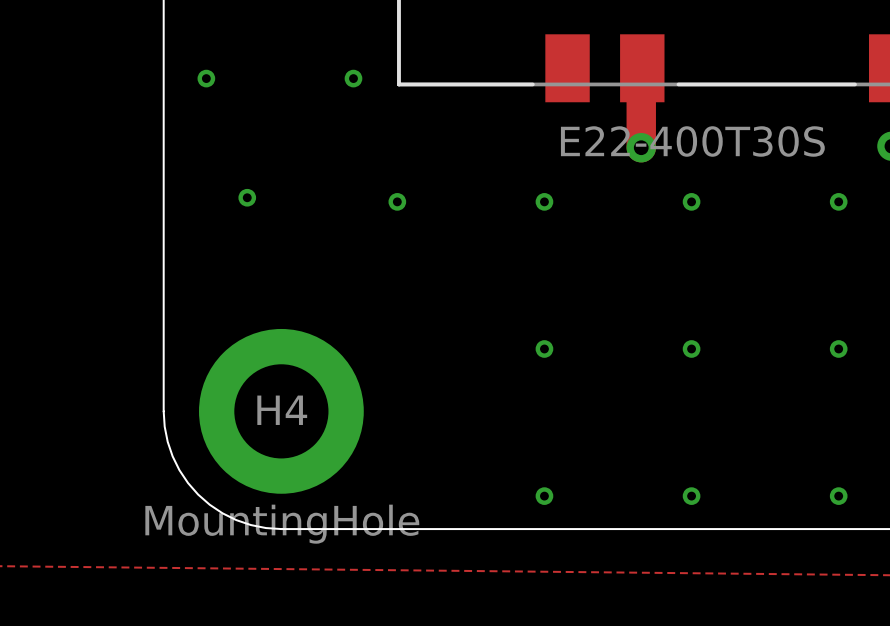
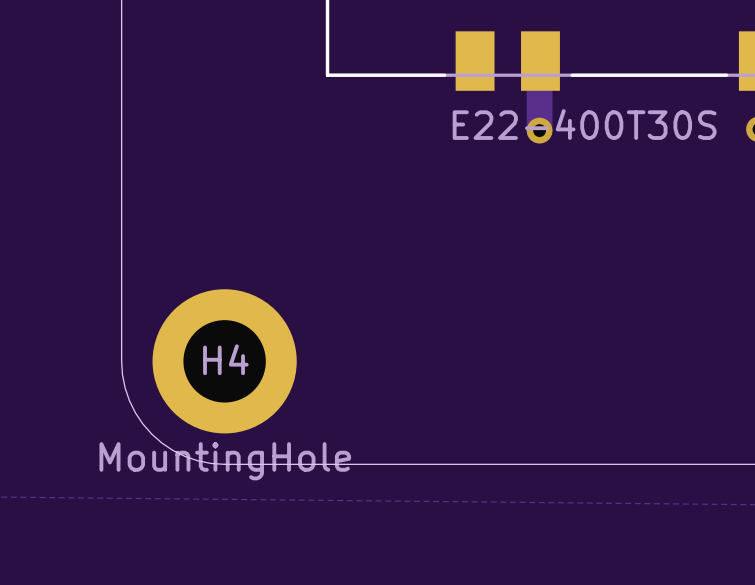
via: (206, 78) -> none
via: (353, 78) -> none
via: (247, 197) -> none
via: (397, 201) -> none
via: (544, 201) -> none
via: (691, 201) -> none
via: (838, 201) -> none
via: (544, 348) -> none
via: (691, 348) -> none
via: (838, 348) -> none
via: (544, 496) -> none
via: (691, 496) -> none
via: (838, 496) -> none

